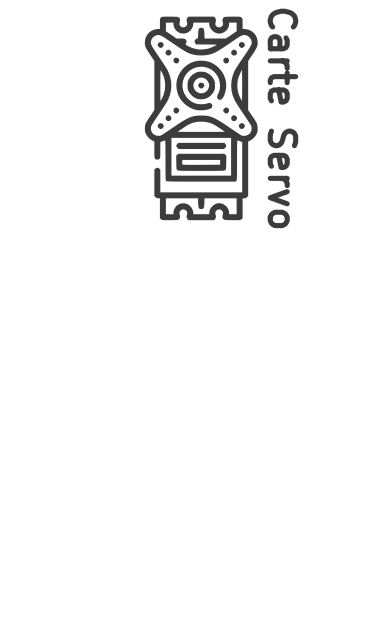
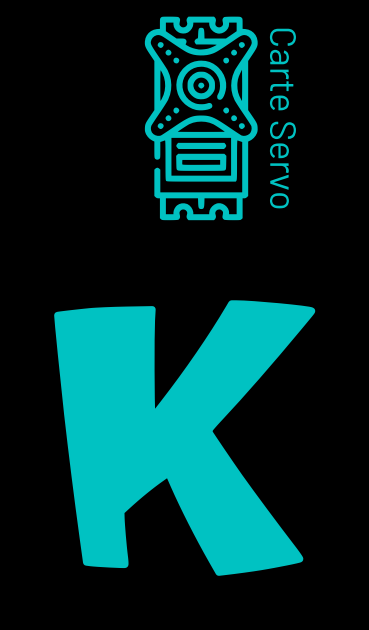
drawing: none -> [54, 300, 316, 576]

